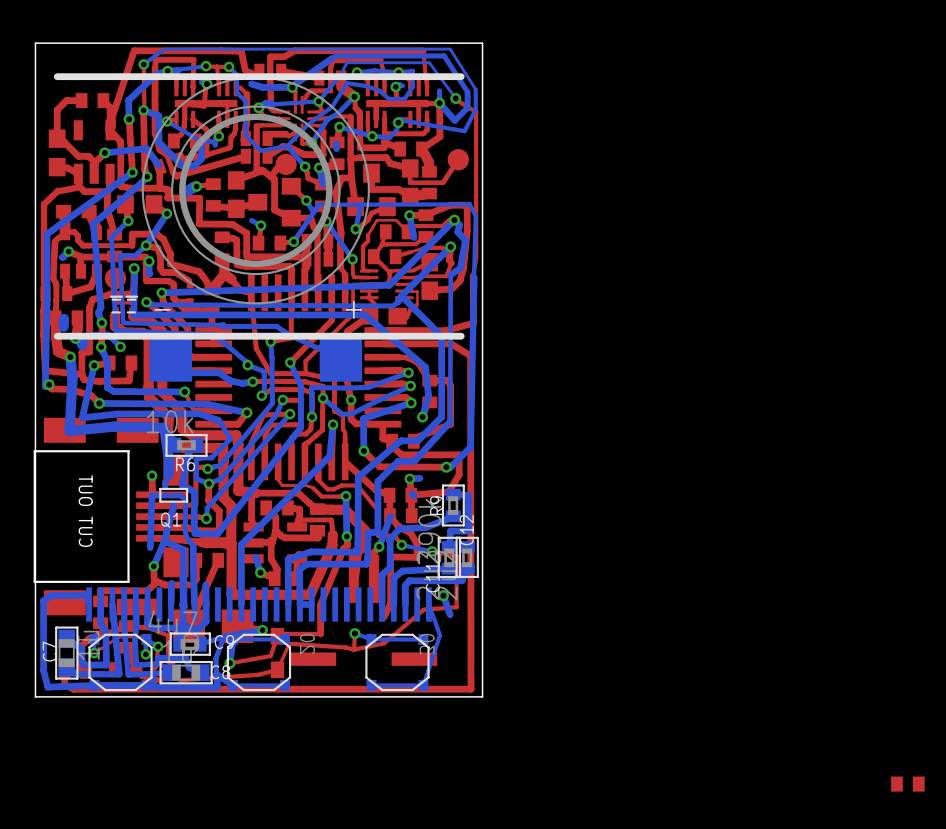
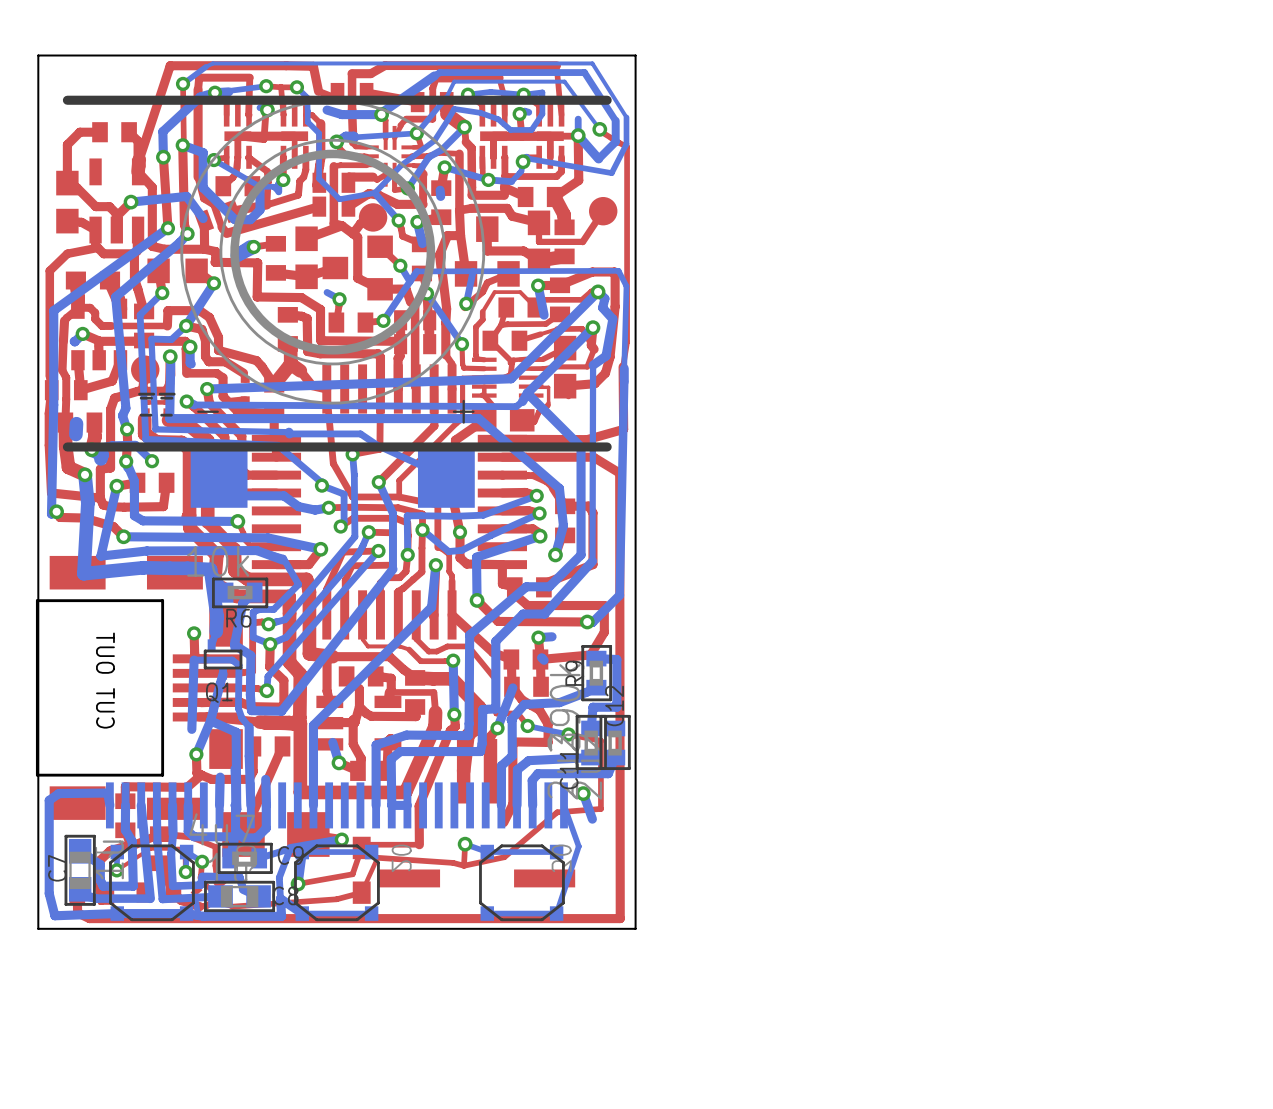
part: (907, 784) -> none

